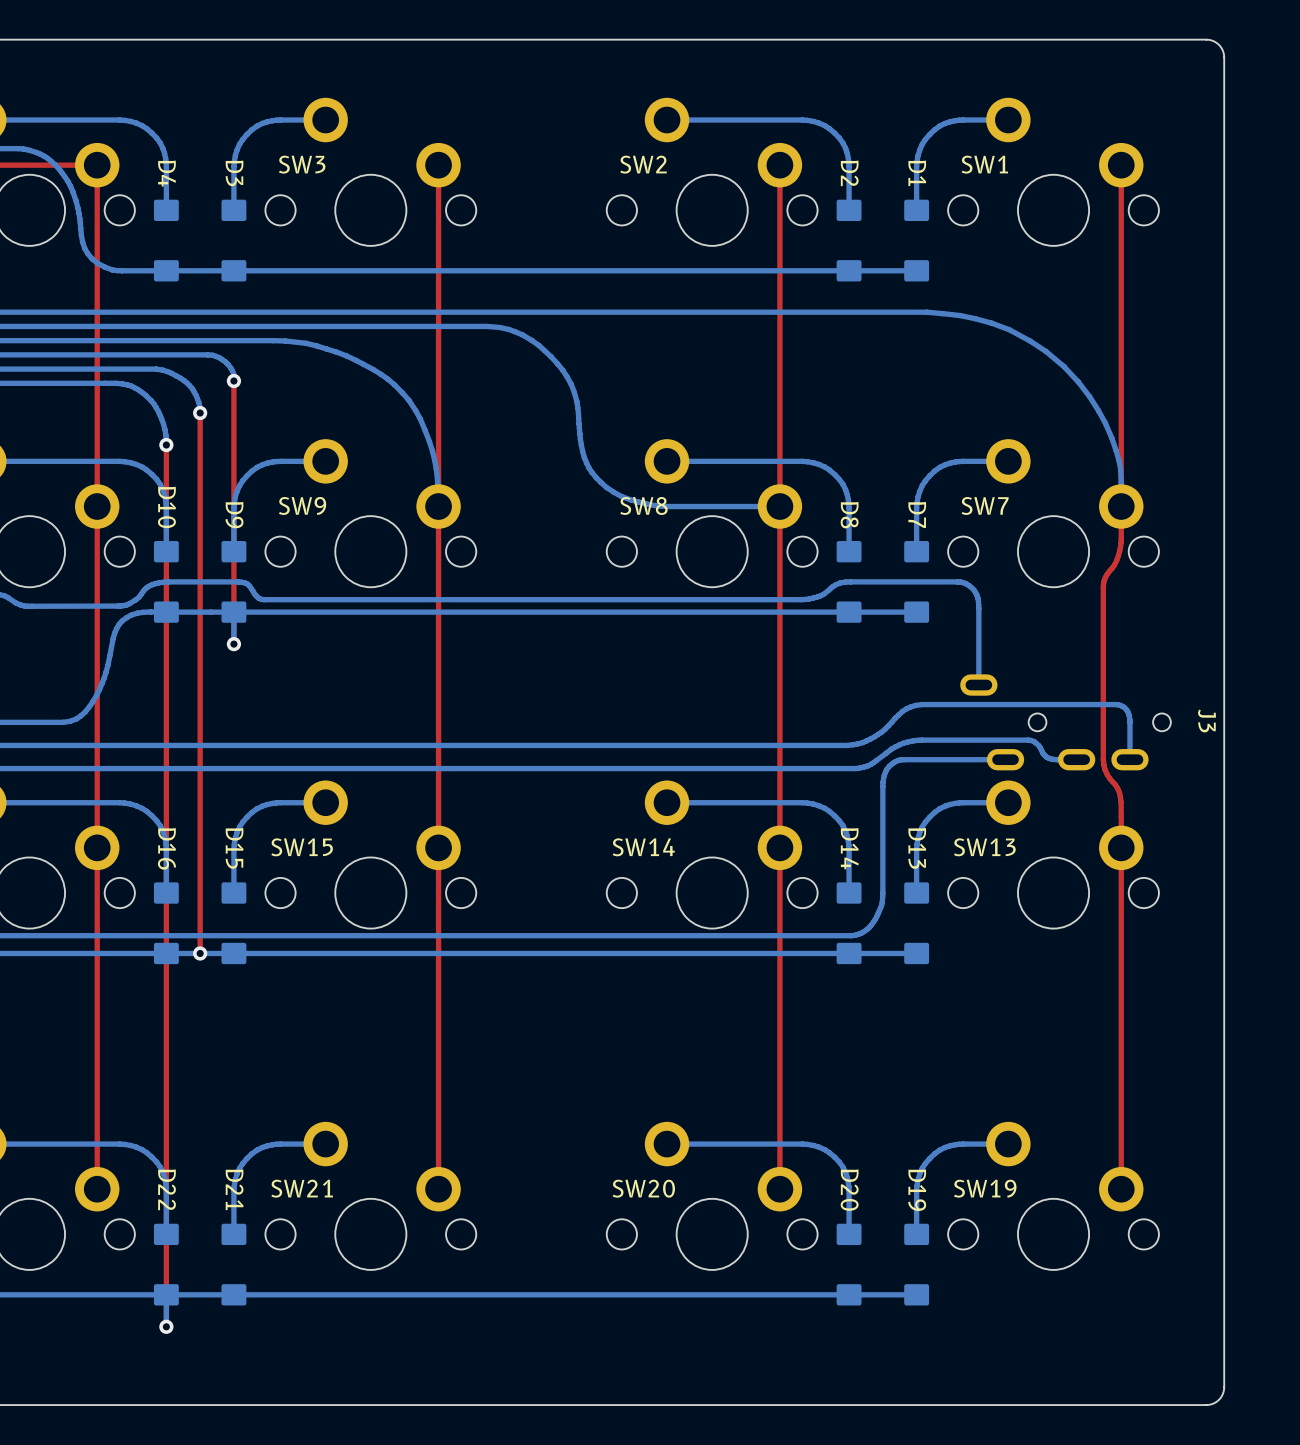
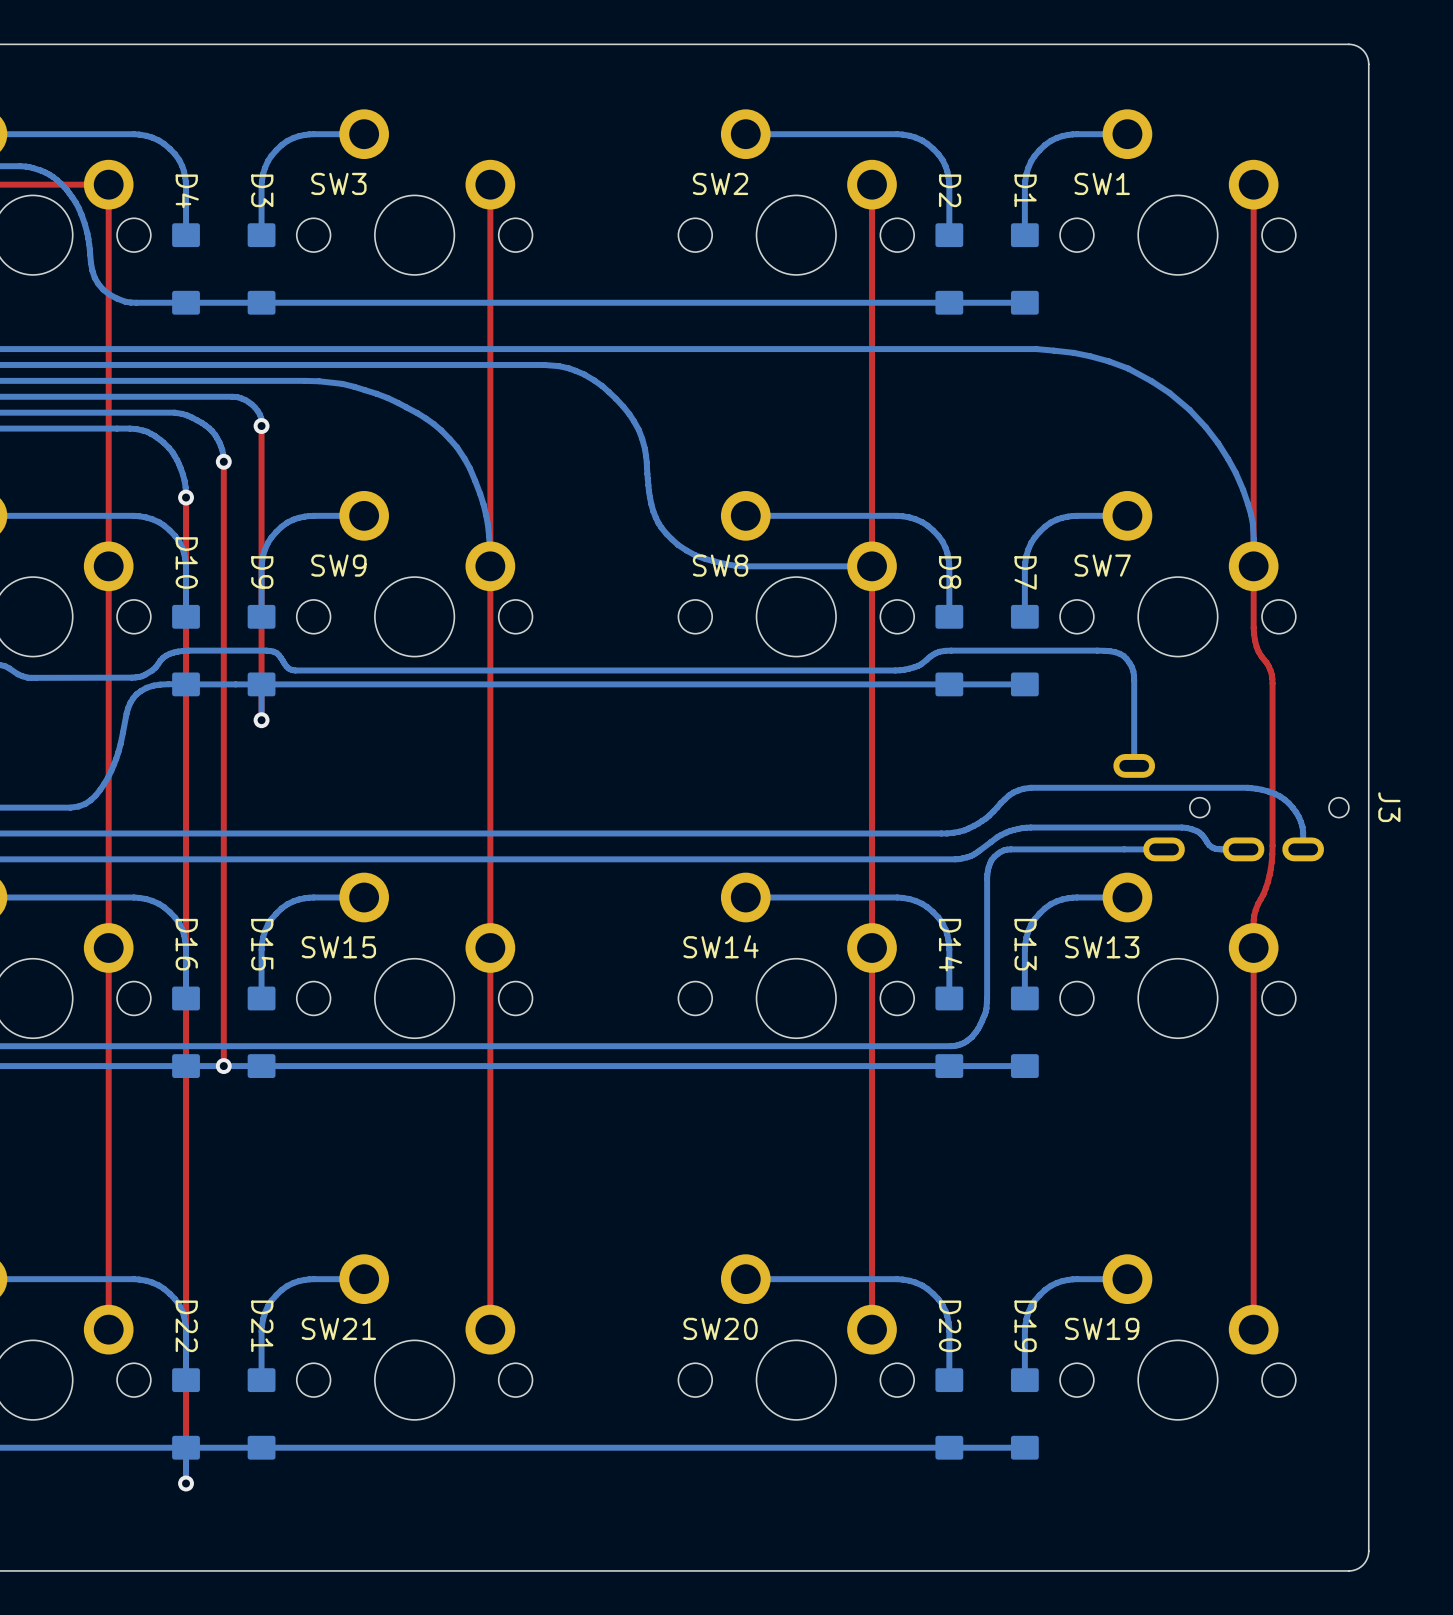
top track: (1121, 538) (1116, 560) (1105, 577) (1103, 587) (1103, 759) (1107, 774) (1119, 792) (1121, 822) -> (1253, 602) (1255, 640) (1258, 651) (1270, 670) (1272, 683) (1271, 862) (1267, 881) (1255, 910) (1253, 920)
bottom track: (957, 581) (969, 585) (978, 598) (978, 685) -> (1070, 650) (1115, 652) (1123, 655) (1132, 667) (1134, 680) (1134, 765)
bottom track: (1118, 704) (1126, 709) (1129, 716) (1129, 759) -> (1251, 788) (1275, 793) (1292, 807) (1302, 827) (1303, 849)
J3 position: (1065, 722) -> (1231, 807)
bottom track: (1028, 740) (1036, 743) (1048, 758) (1076, 759) -> (1149, 827) (1186, 827) (1199, 832) (1209, 845) (1214, 848) (1243, 849)
bottom track: none -> (1164, 849) (1124, 849)

